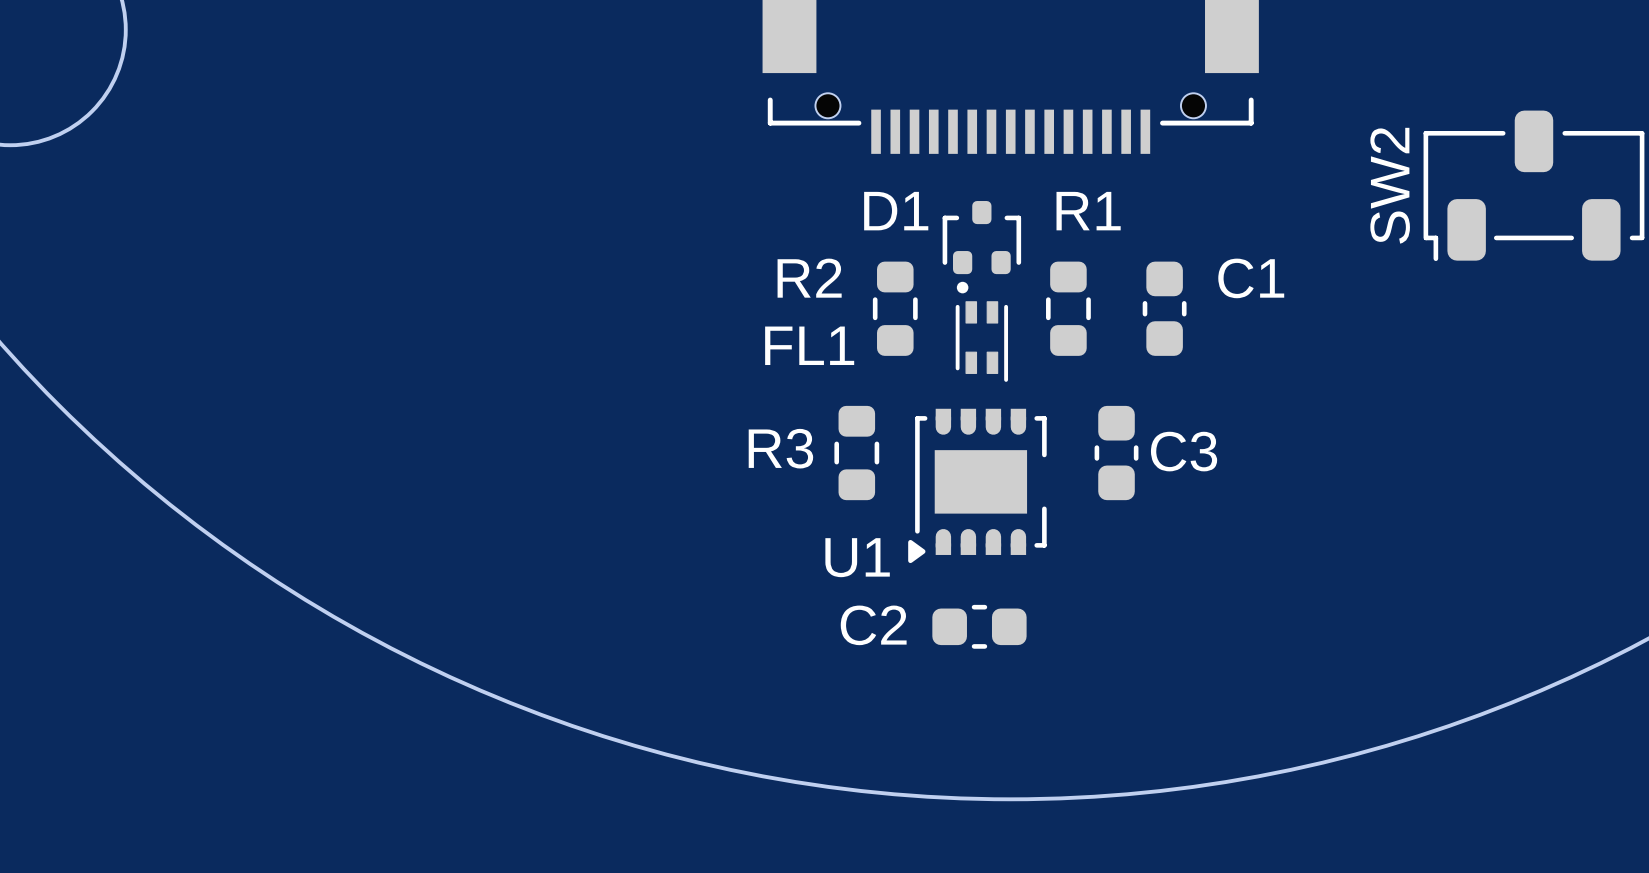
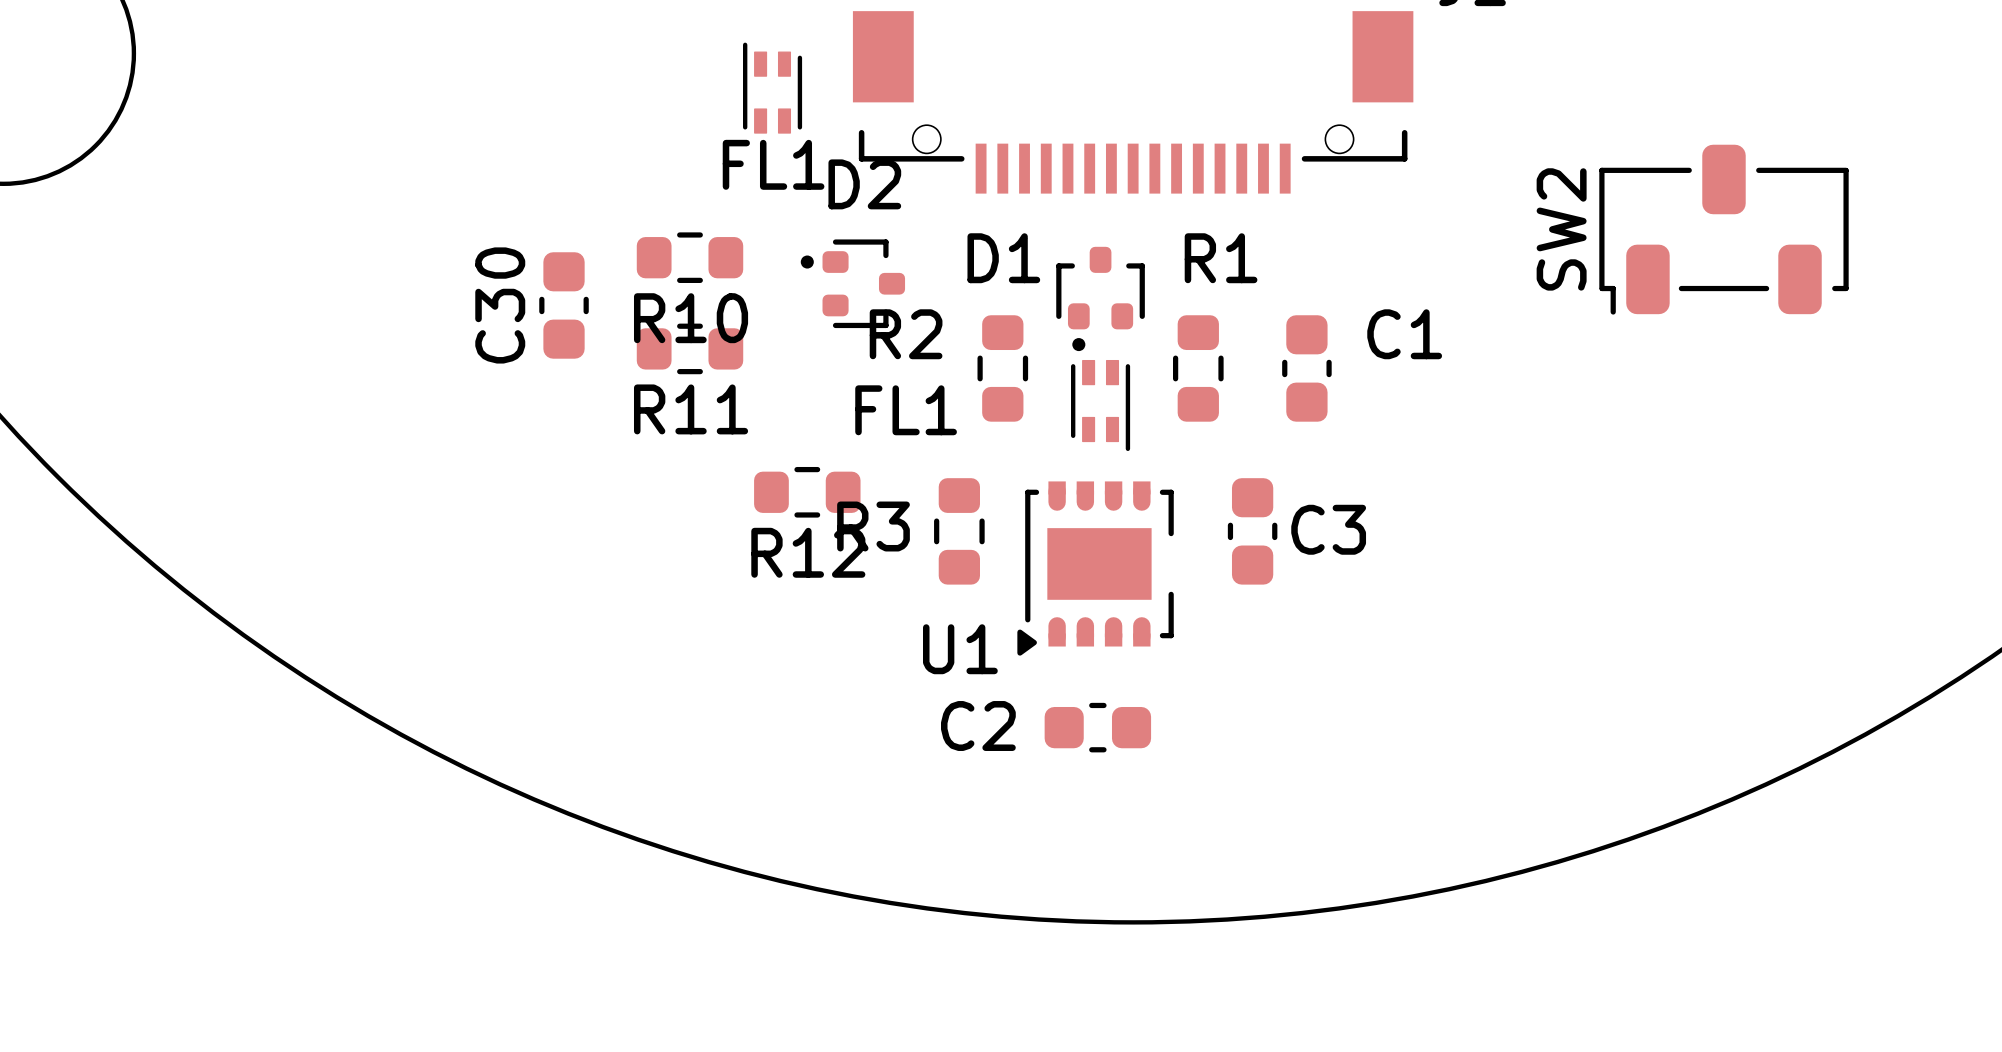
FL1: none -> (772, 88)
R10: none -> (690, 257)
D2: none -> (852, 283)
C30: none -> (564, 305)
R11: none -> (690, 348)
R12: none -> (807, 492)

